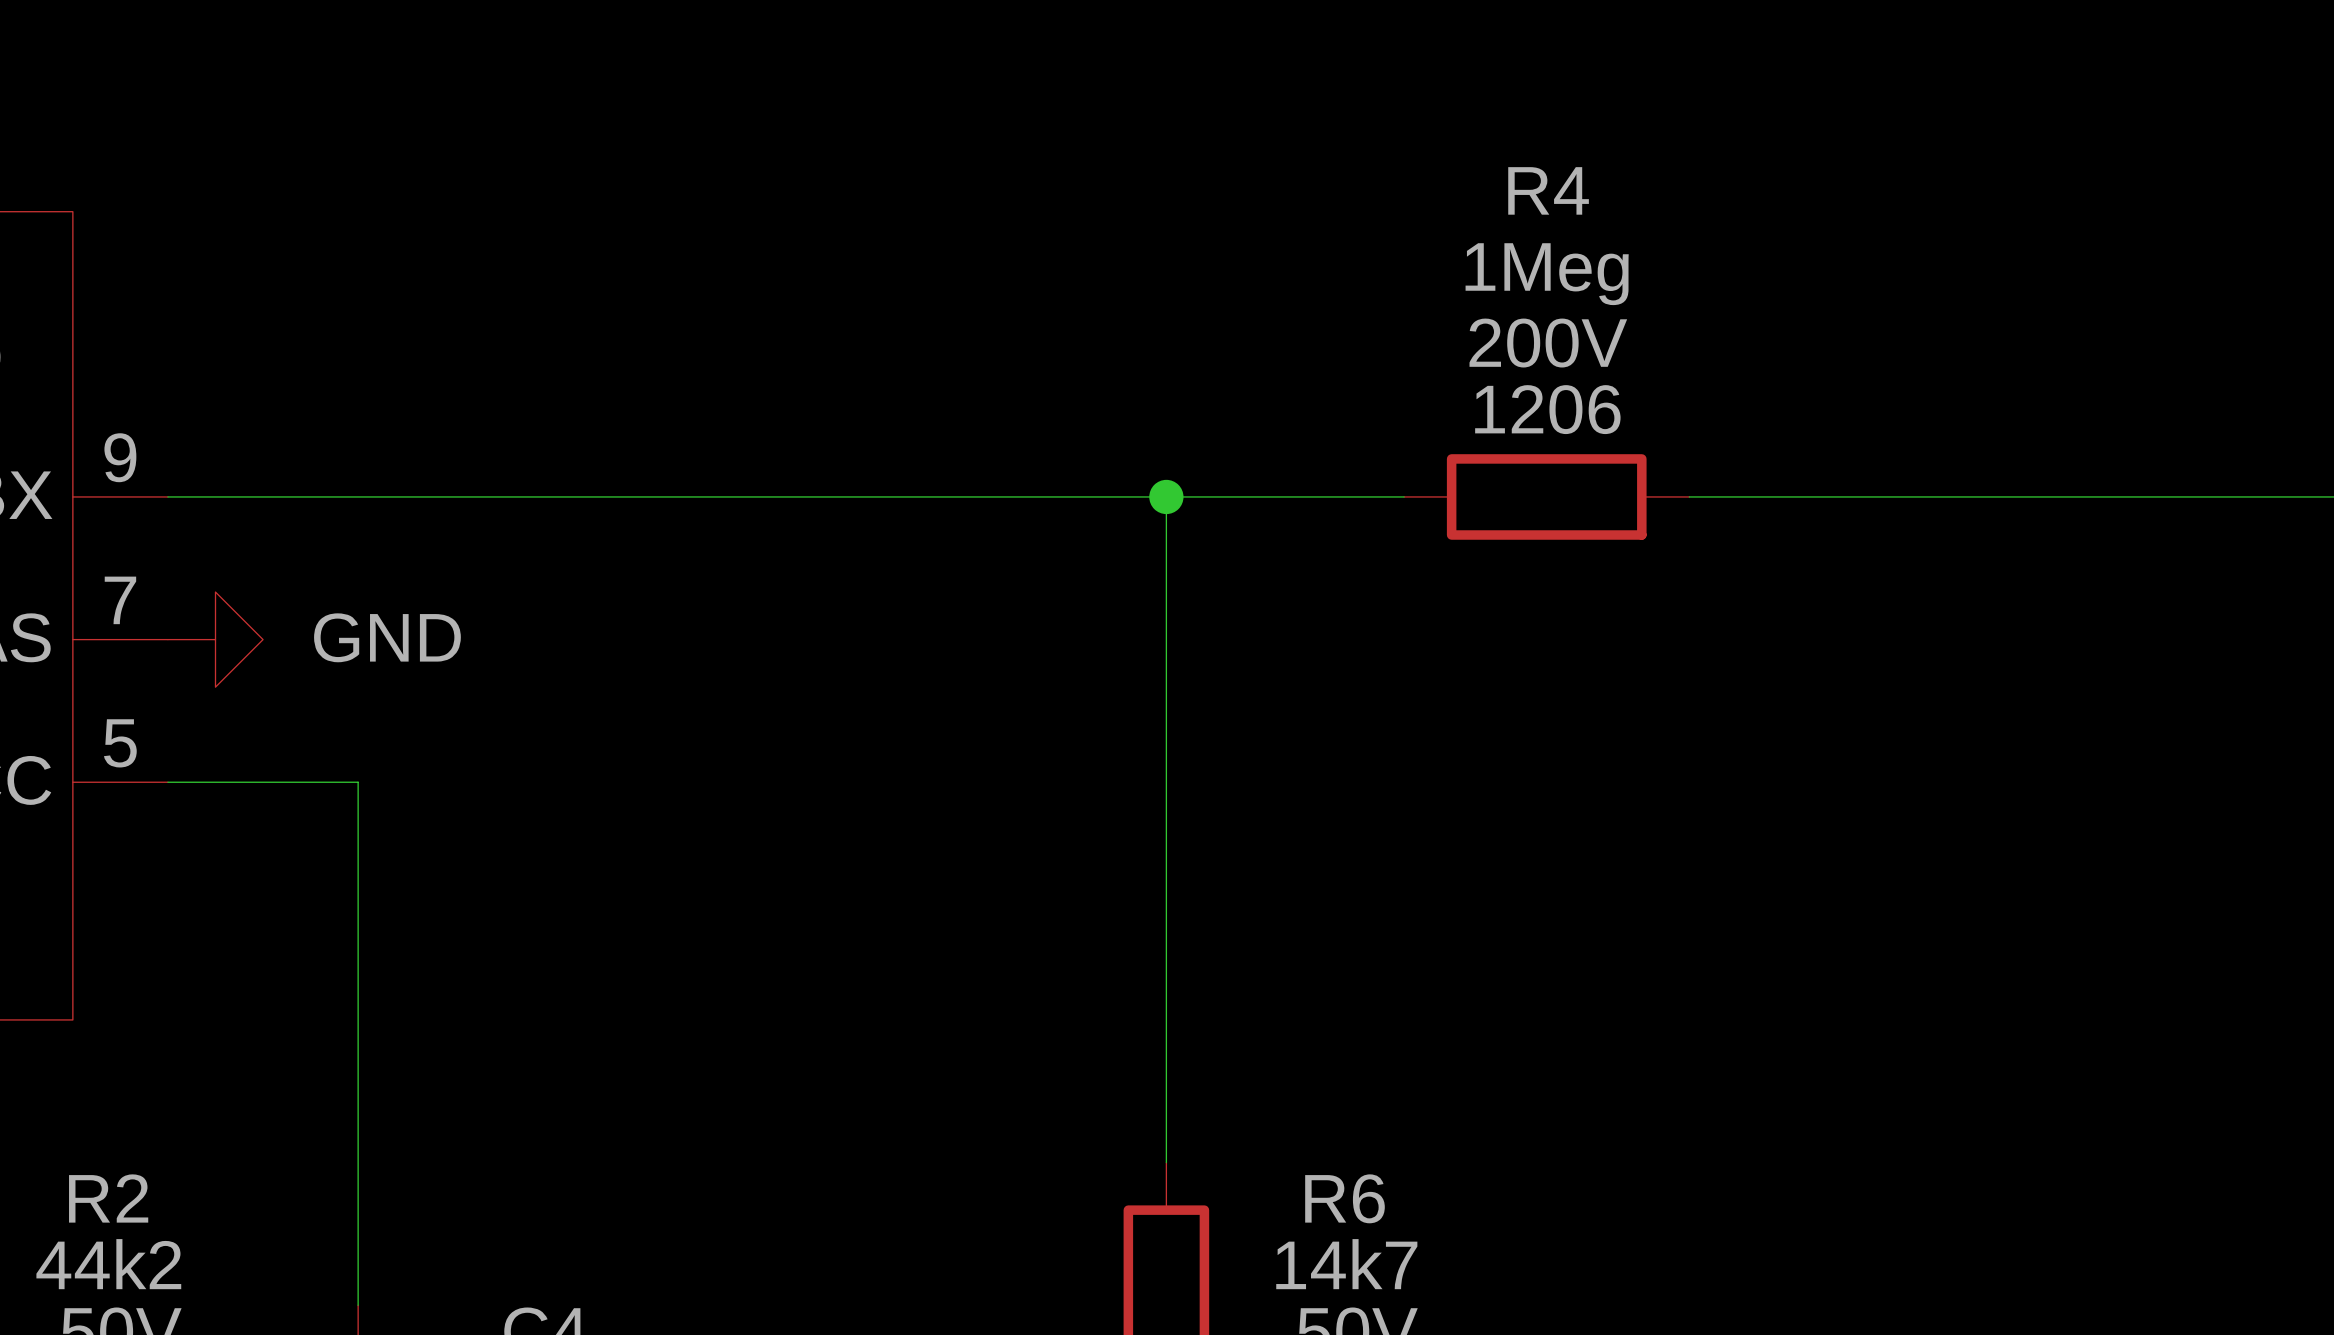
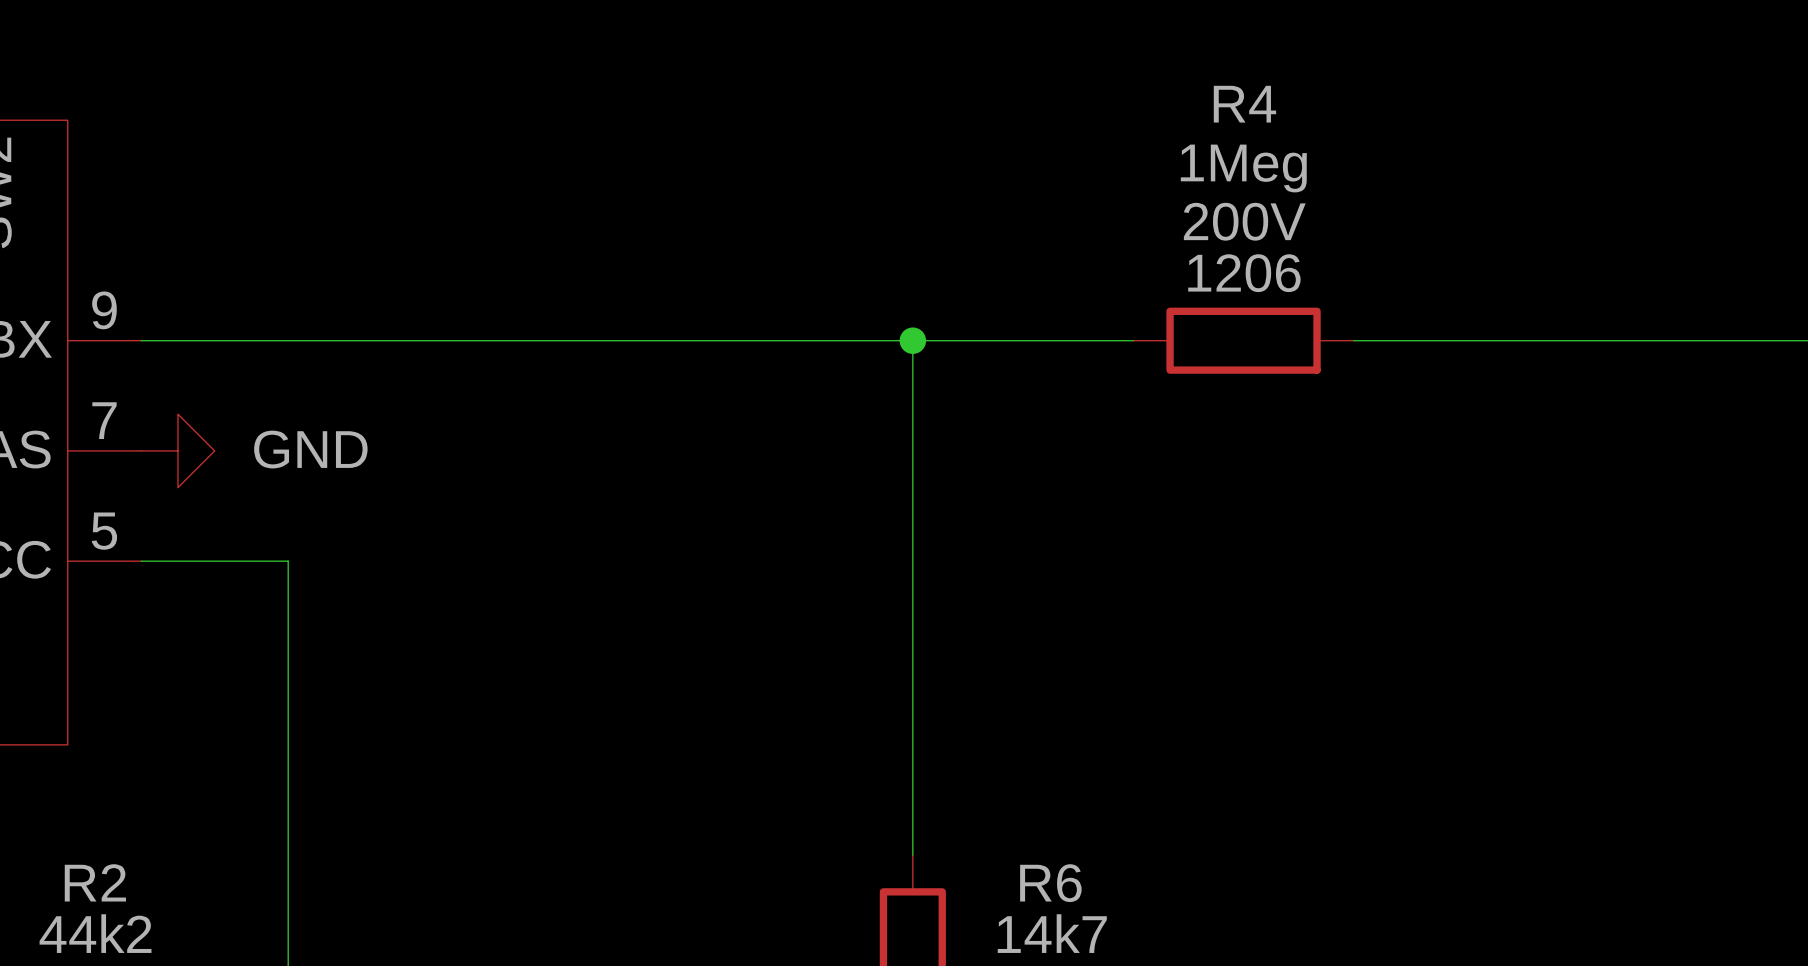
R4 position: (1546, 496) -> (1243, 340)

